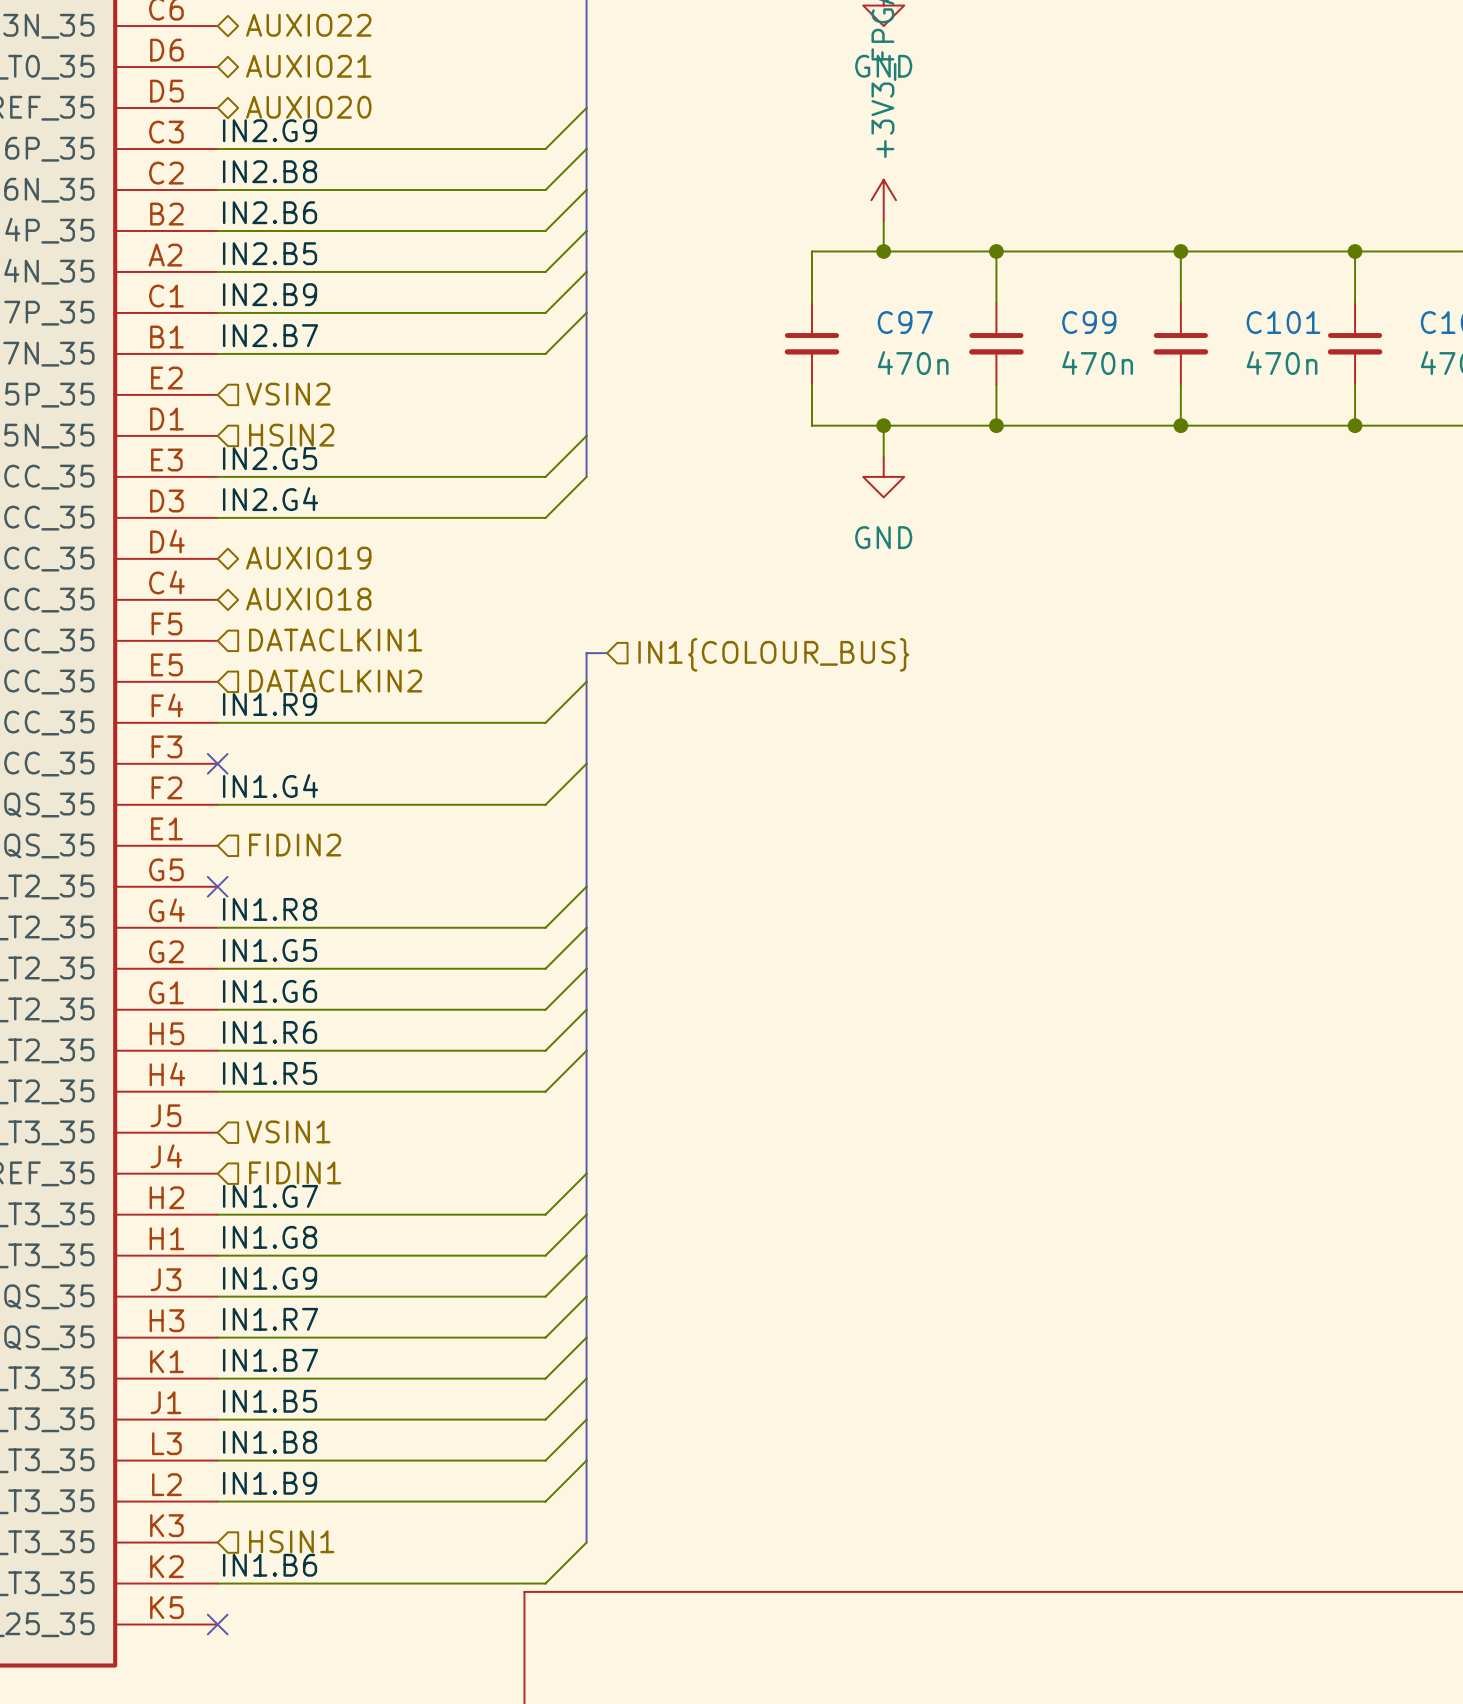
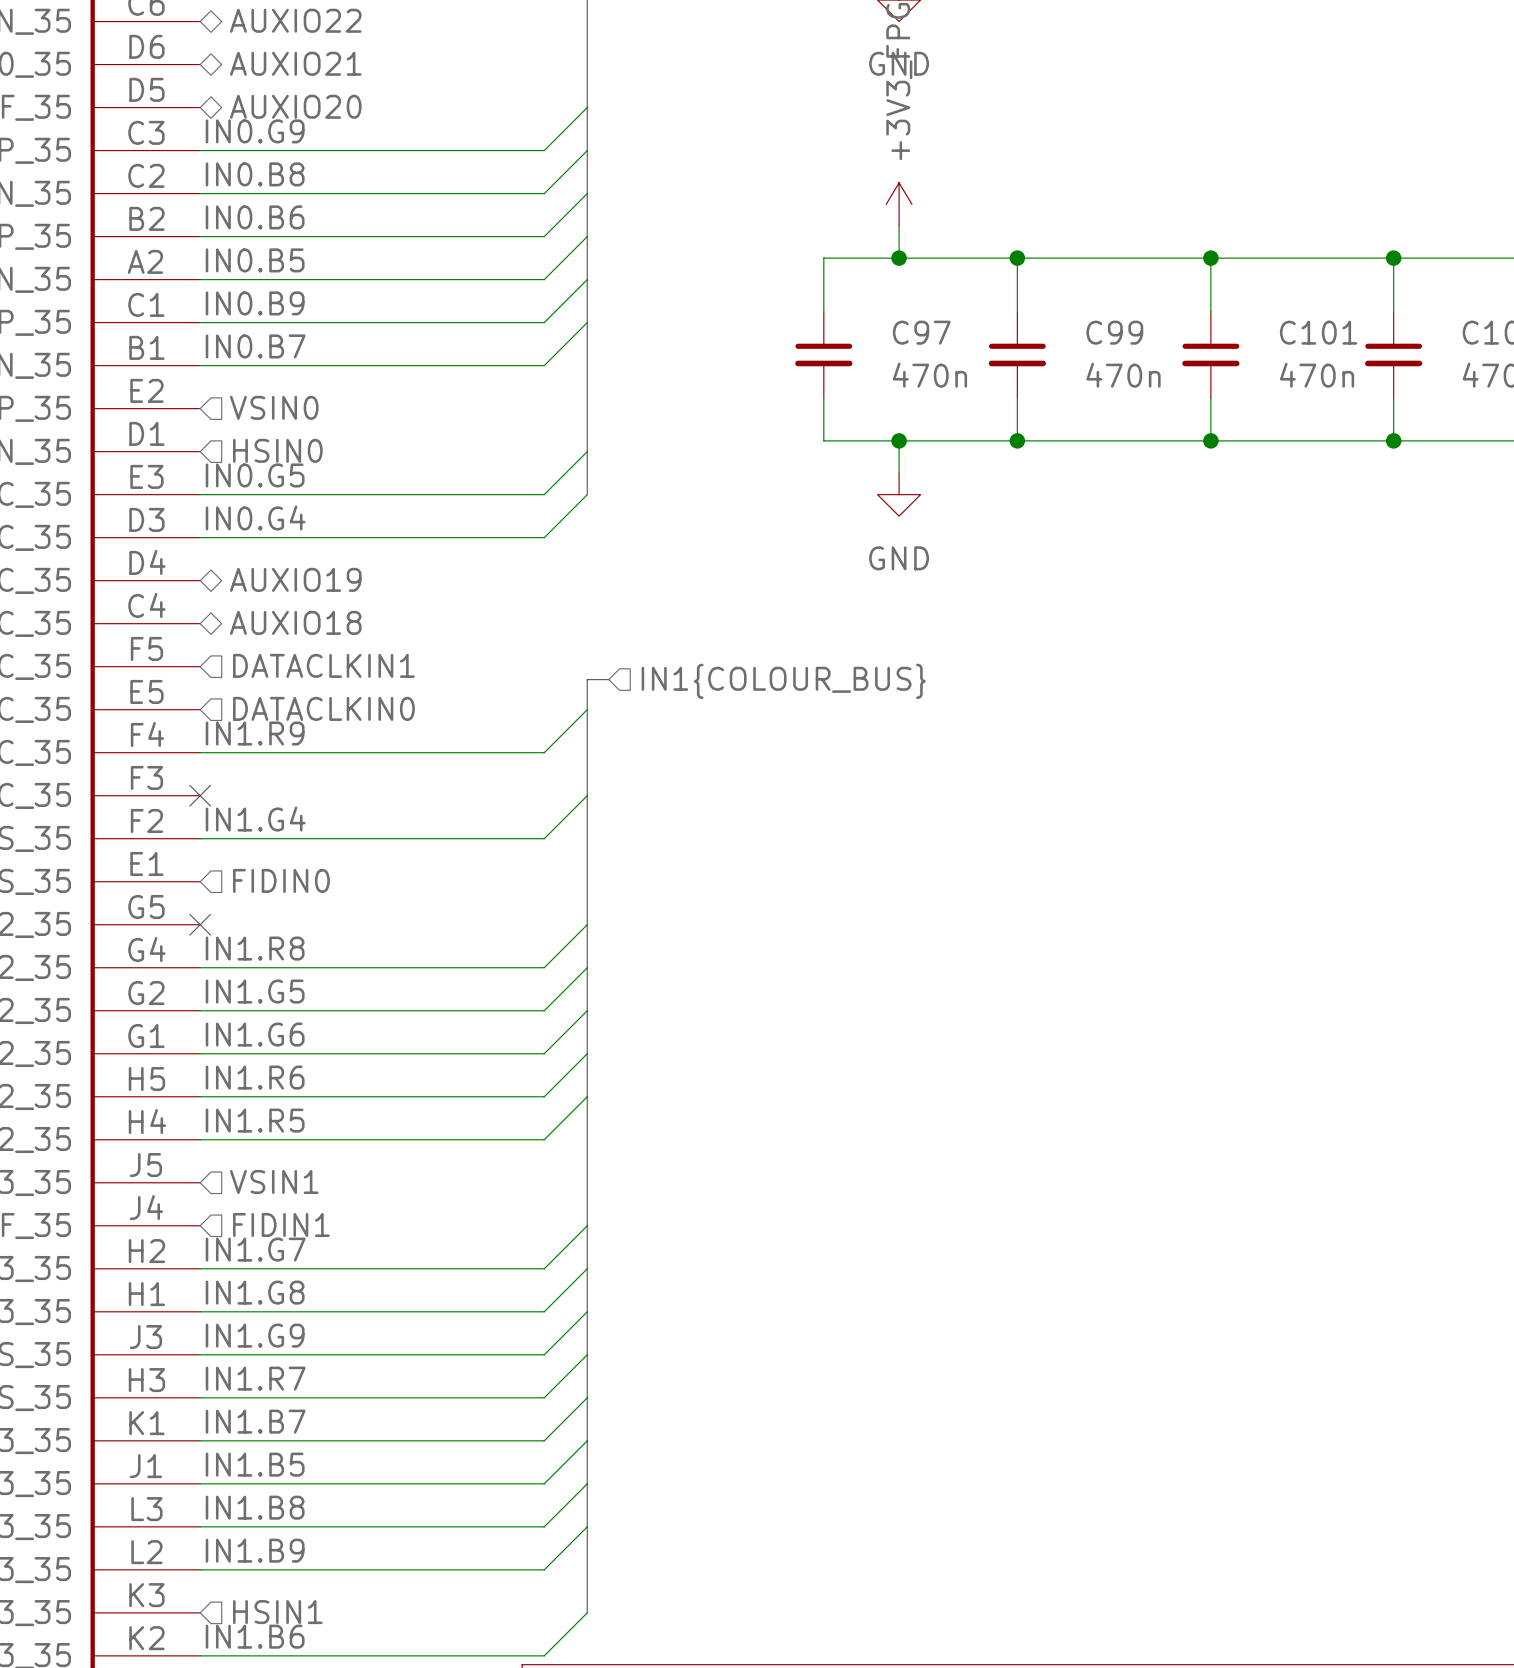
label: IN2.G9 (270, 130) -> IN0.G9 (255, 131)
label: IN2.B8 (270, 171) -> IN0.B8 (255, 174)
label: IN2.B6 (270, 212) -> IN0.B6 (255, 217)
label: IN2.B5 (270, 253) -> IN0.B5 (255, 260)
label: IN2.B9 (270, 294) -> IN0.B9 (255, 303)
label: IN2.B7 (270, 335) -> IN0.B7 (255, 346)
hierarchical label: VSIN2 (288, 394) -> VSIN0 (274, 407)
hierarchical label: HSIN2 (291, 435) -> HSIN0 (277, 450)
label: IN2.G5 (270, 458) -> IN0.G5 (255, 475)
label: IN2.G4 (270, 499) -> IN0.G4 (255, 517)
hierarchical label: DATACLKIN2 (335, 681) -> DATACLKIN0 (323, 708)
hierarchical label: FIDIN2 (295, 845) -> FIDIN0 (281, 880)

